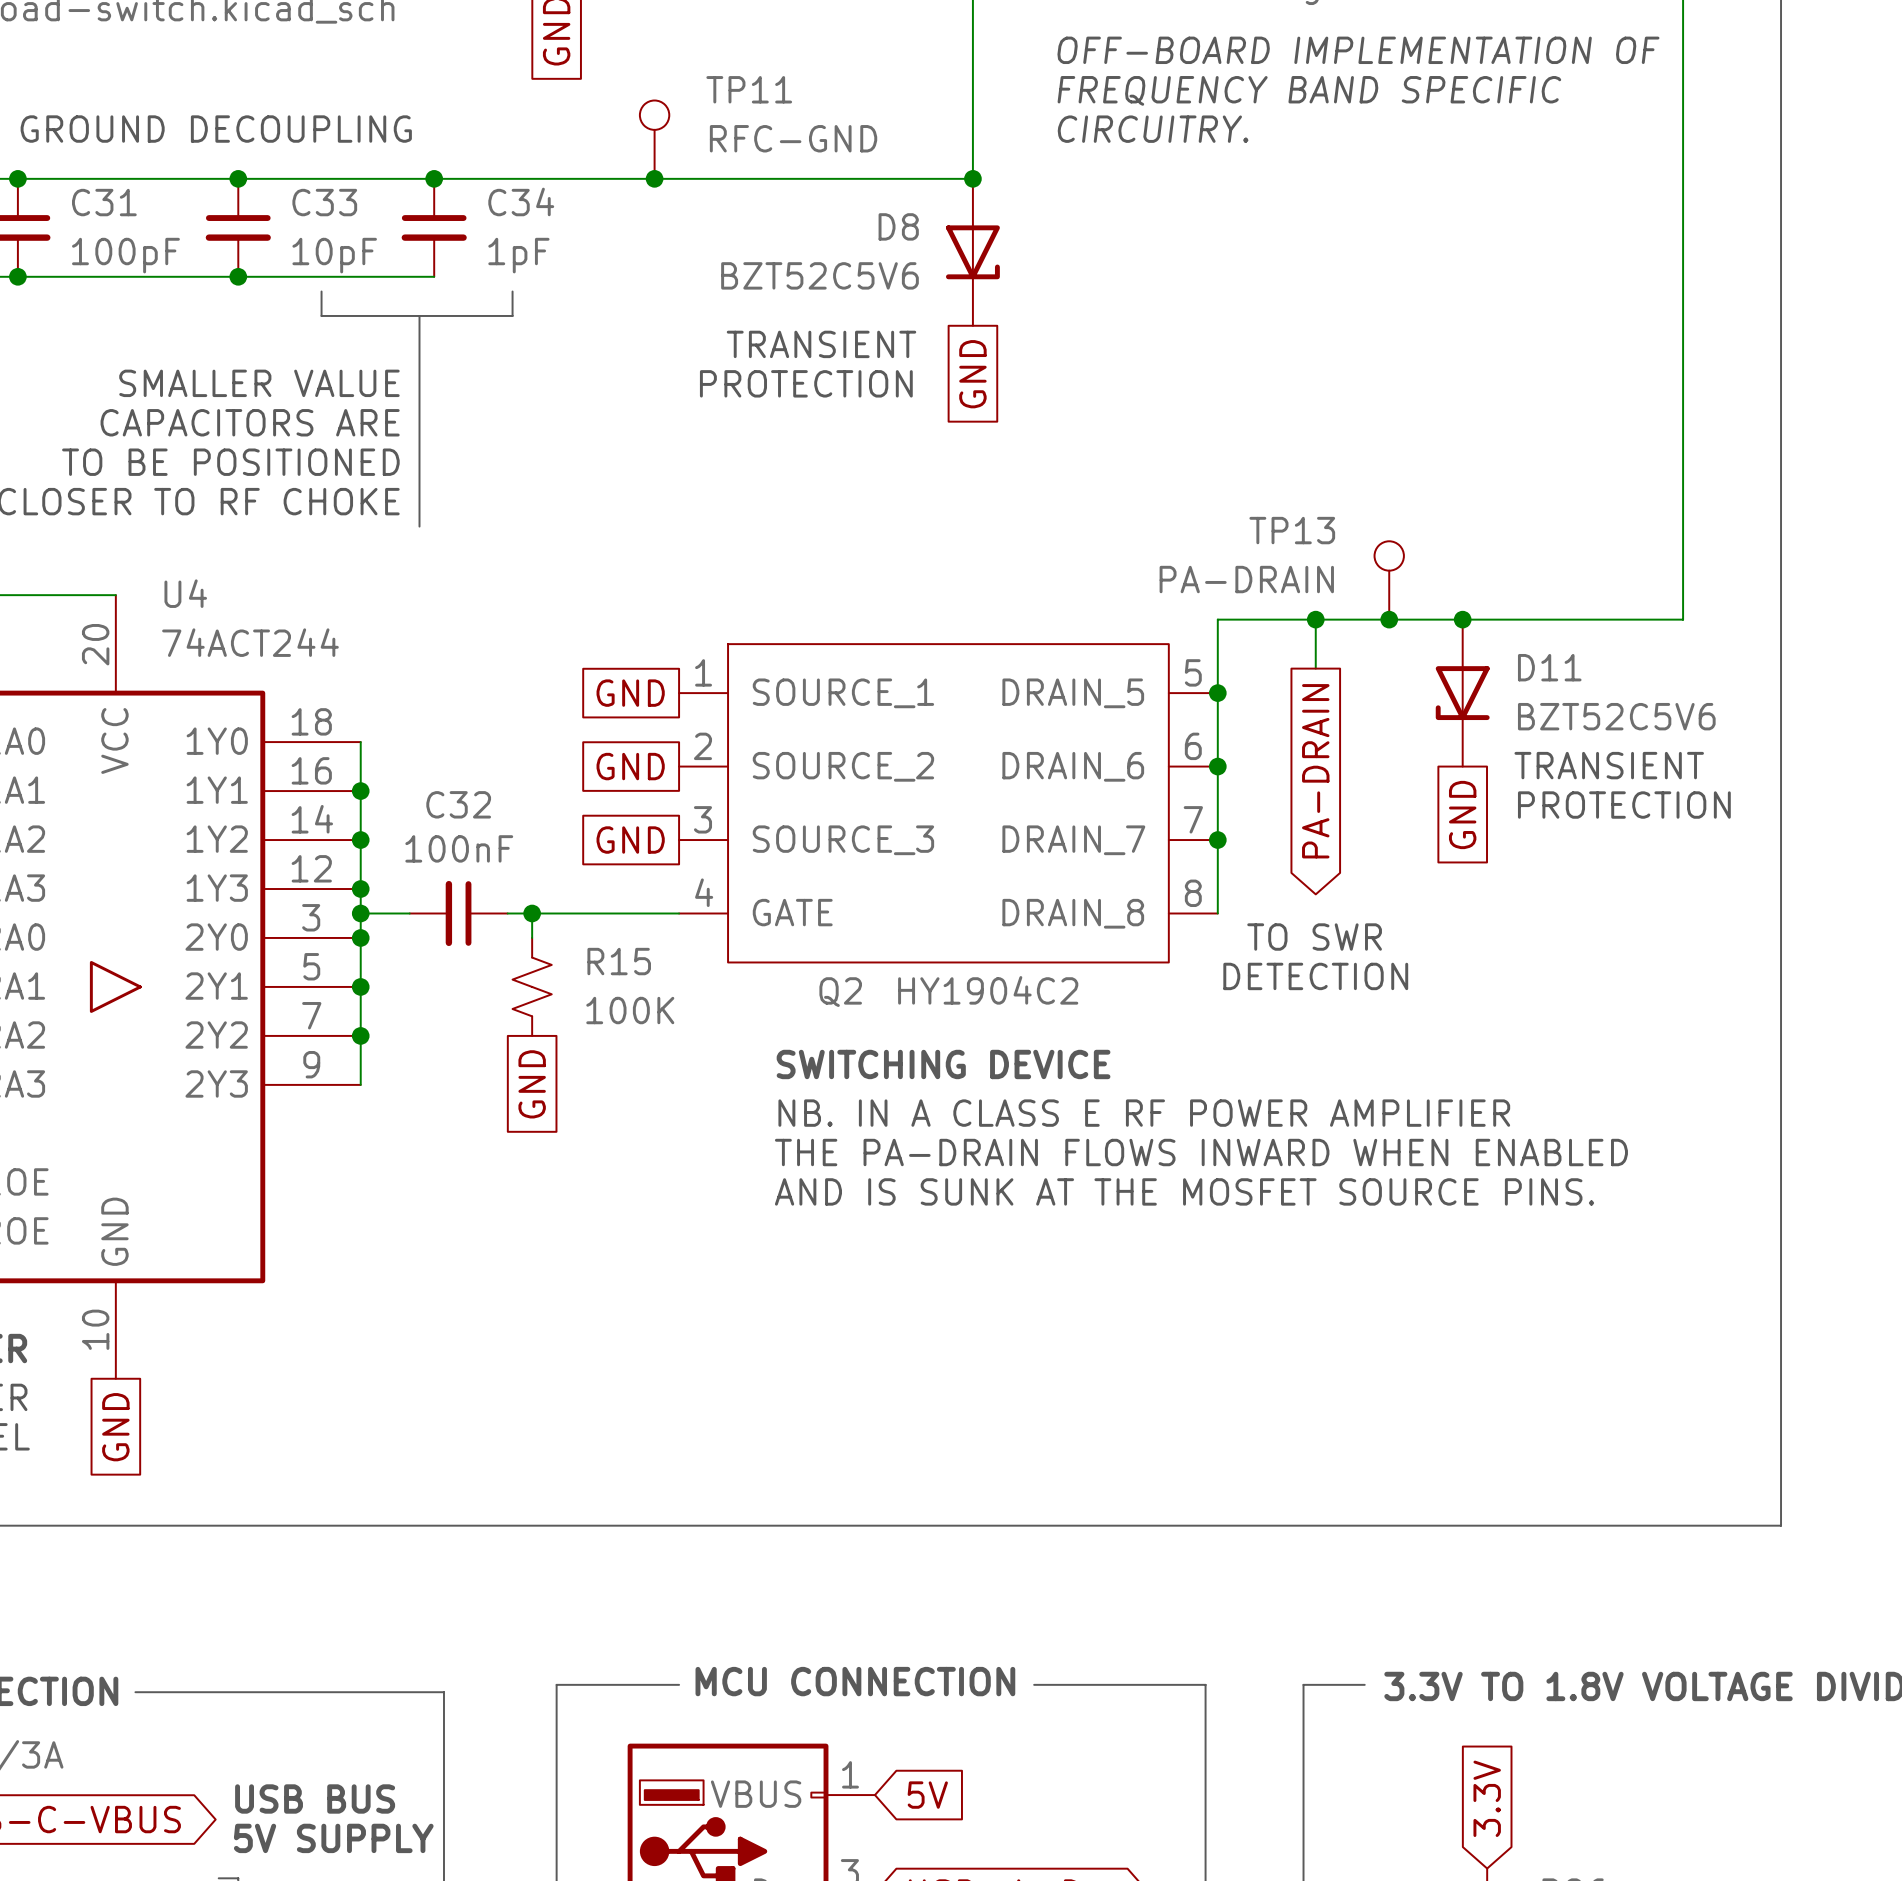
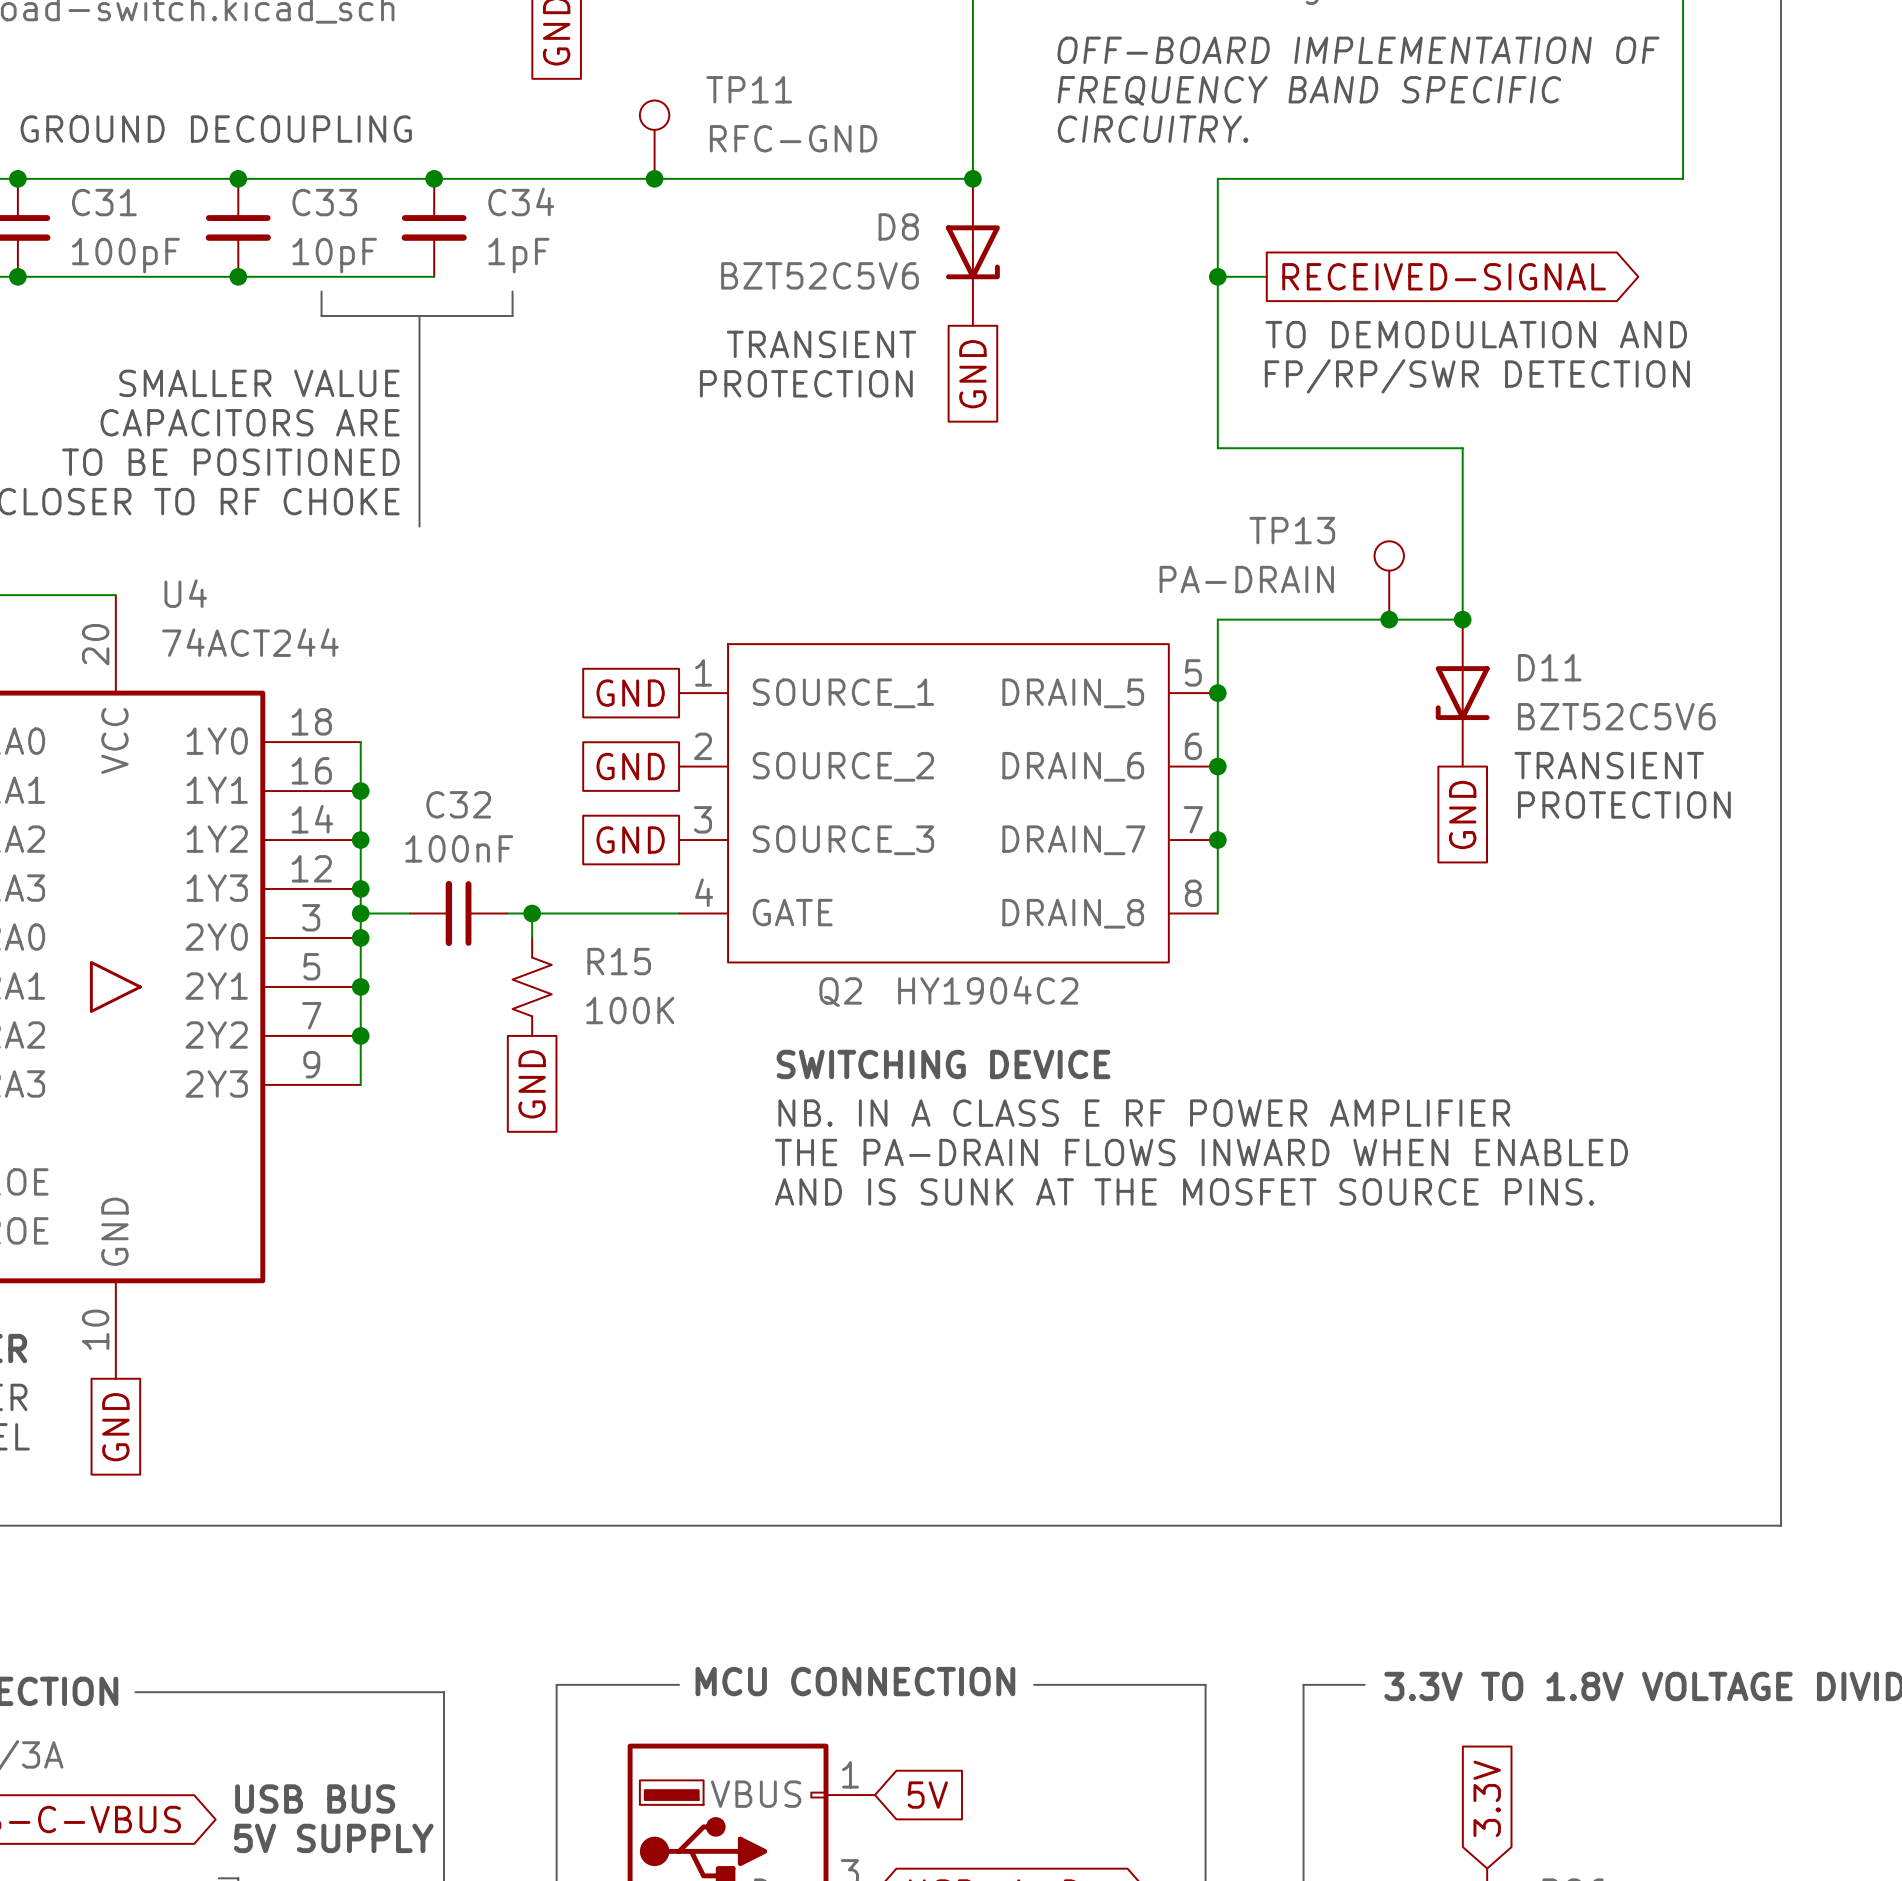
wire: (1683, 178) (1683, 619) (1462, 619) -> (1683, 178) (1217, 178) (1217, 448) (1462, 448) (1462, 619)
wire: none -> (1217, 276) (1266, 276)
junction: none -> (1217, 276)
global label: none -> RECEIVED-SIGNAL (1444, 276)
text: none -> TO DEMODULATION AND (1476, 334)
text: none -> FP/RP/SWR DETECTION (1477, 376)
wire: (1315, 619) (1315, 668) -> none
junction: (1315, 619) -> none
global label: PA-DRAIN (1315, 771) -> none
text: TO SWR (1314, 937) -> none
text: DETECTION (1315, 976) -> none

